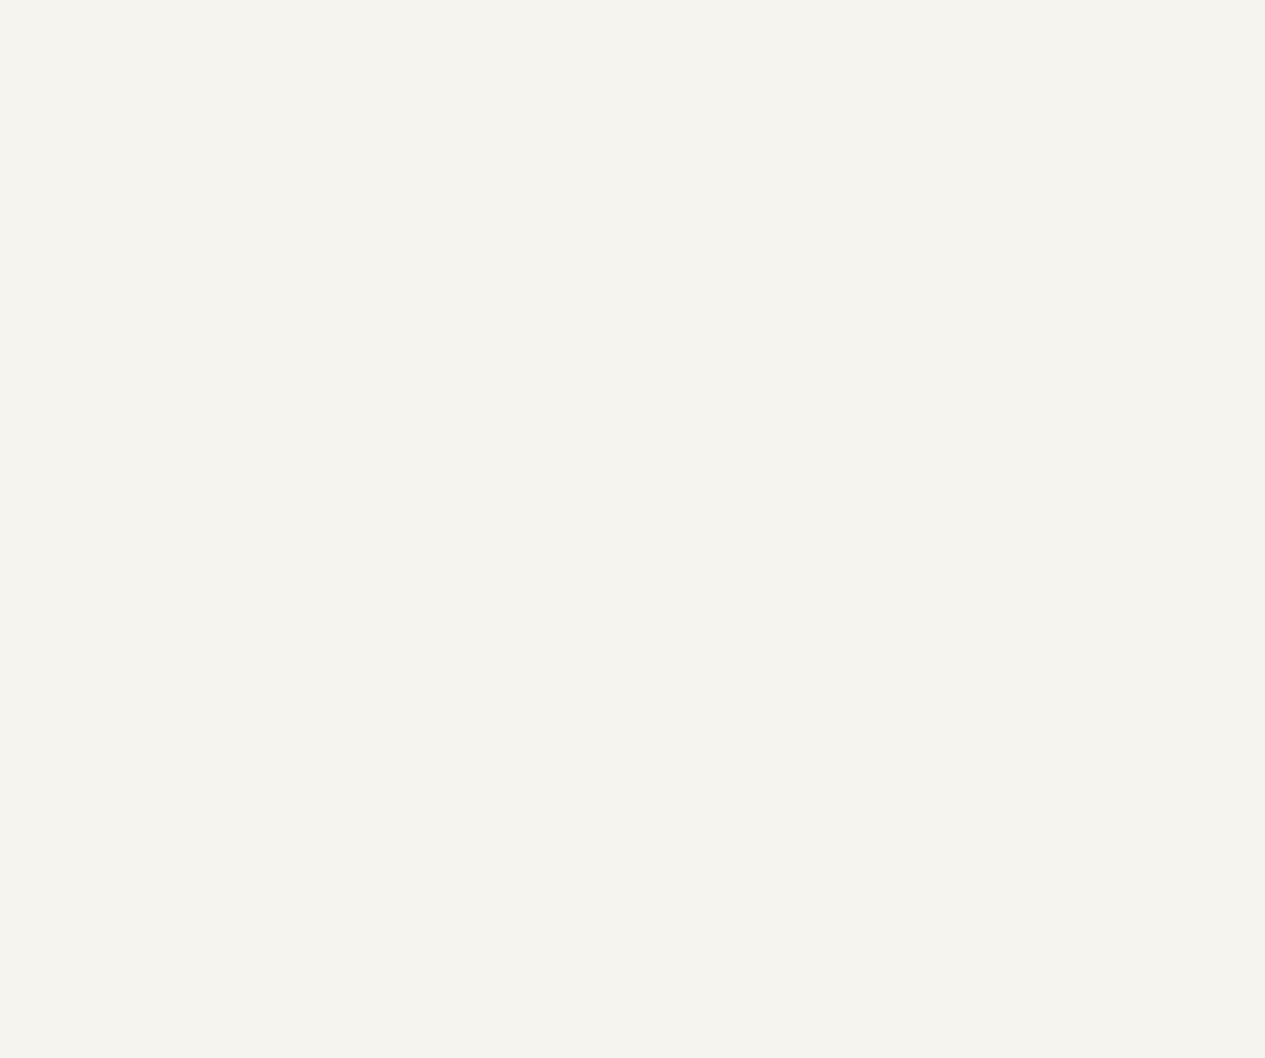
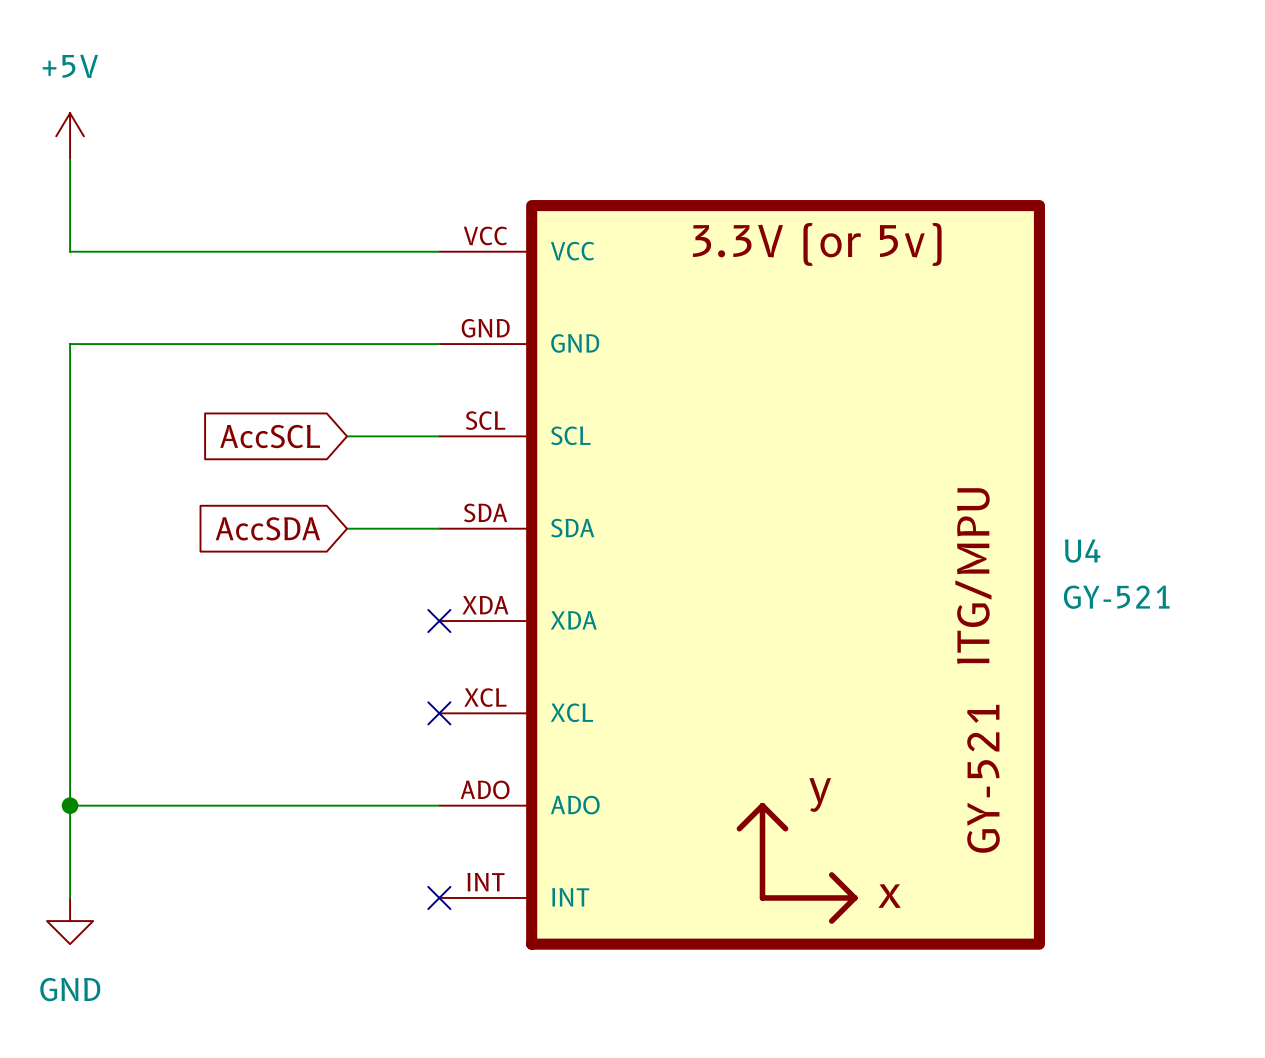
power symbol: none -> +5V (70, 136)
wire: none -> (70, 159) (70, 251) (439, 251)
wire: none -> (439, 344) (70, 344) (70, 897)
global label: none -> AccSCL (270, 436)
wire: none -> (347, 436) (439, 436)
global label: none -> AccSDA (267, 528)
wire: none -> (347, 528) (439, 528)
U4: none -> GY-521 (742, 574)
no-connect mark: none -> (439, 621)
no-connect mark: none -> (439, 713)
wire: none -> (70, 805) (439, 805)
junction: none -> (70, 805)
no-connect mark: none -> (439, 897)
power symbol: none -> GND (70, 921)

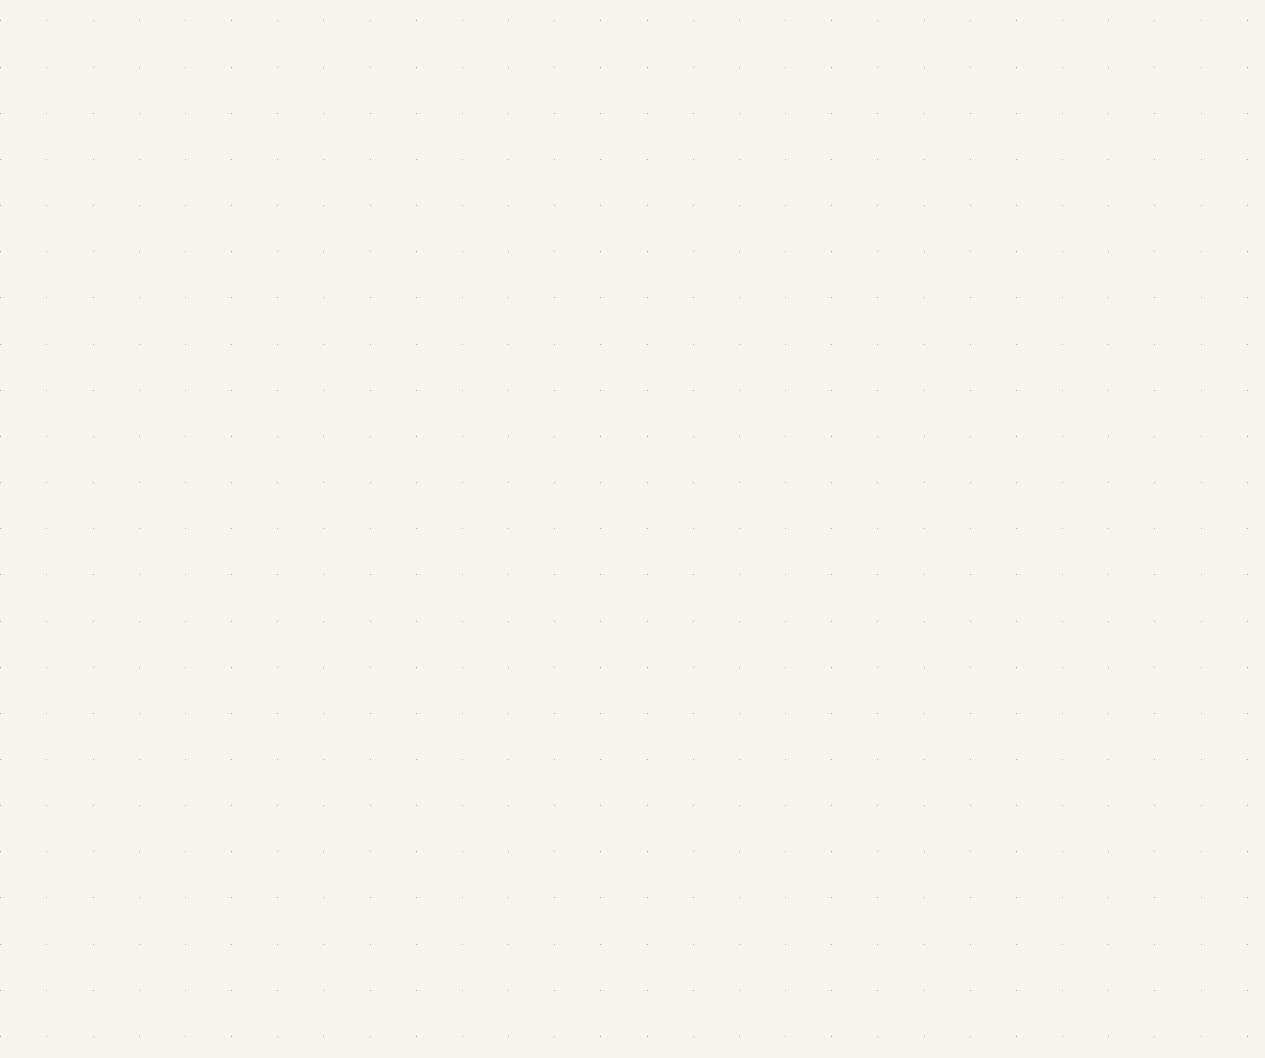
power symbol: +5V (70, 136) -> none
wire: (70, 159) (70, 251) (439, 251) -> none
wire: (439, 344) (70, 344) (70, 897) -> none
global label: AccSCL (270, 436) -> none
wire: (347, 436) (439, 436) -> none
global label: AccSDA (267, 528) -> none
wire: (347, 528) (439, 528) -> none
U4: GY-521 (742, 574) -> none
no-connect mark: (439, 621) -> none
no-connect mark: (439, 713) -> none
wire: (70, 805) (439, 805) -> none
junction: (70, 805) -> none
no-connect mark: (439, 897) -> none
power symbol: GND (70, 921) -> none

